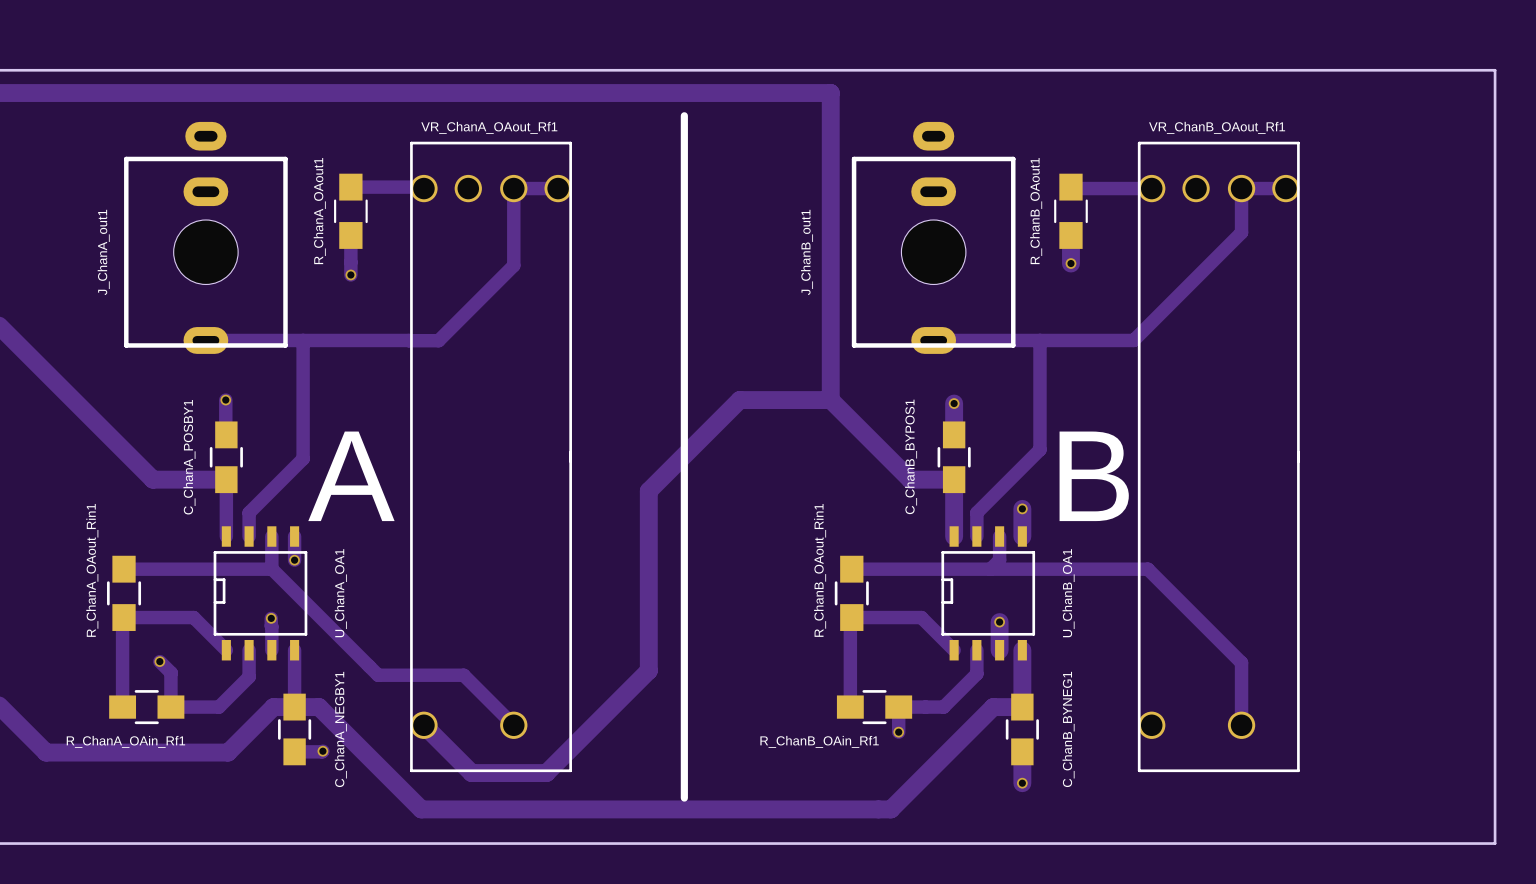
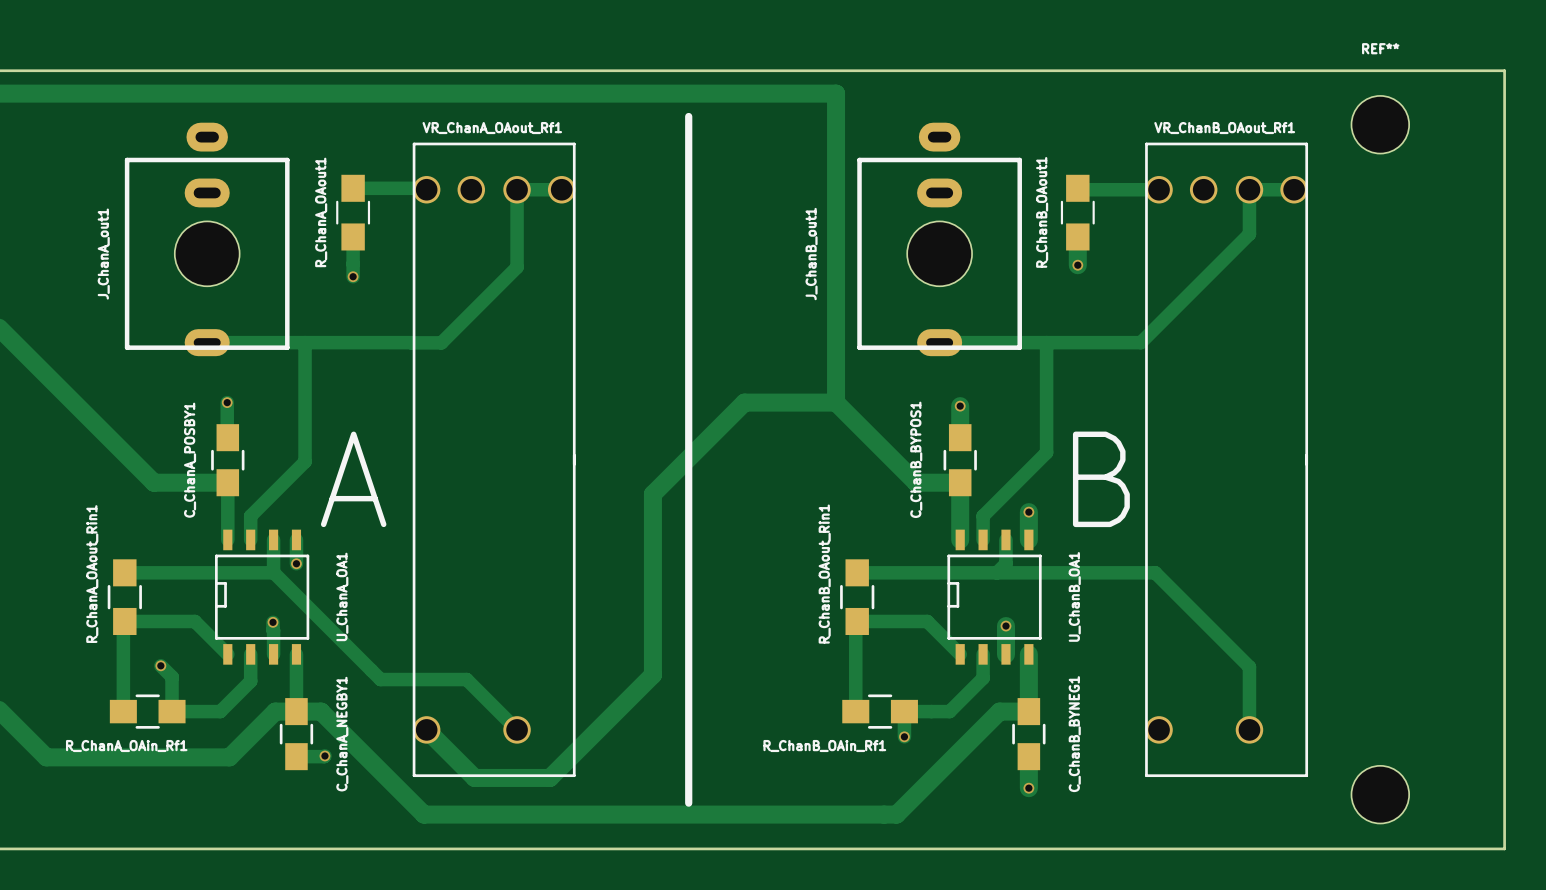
REF**: none -> (1380, 124)
part: none -> (1380, 794)

